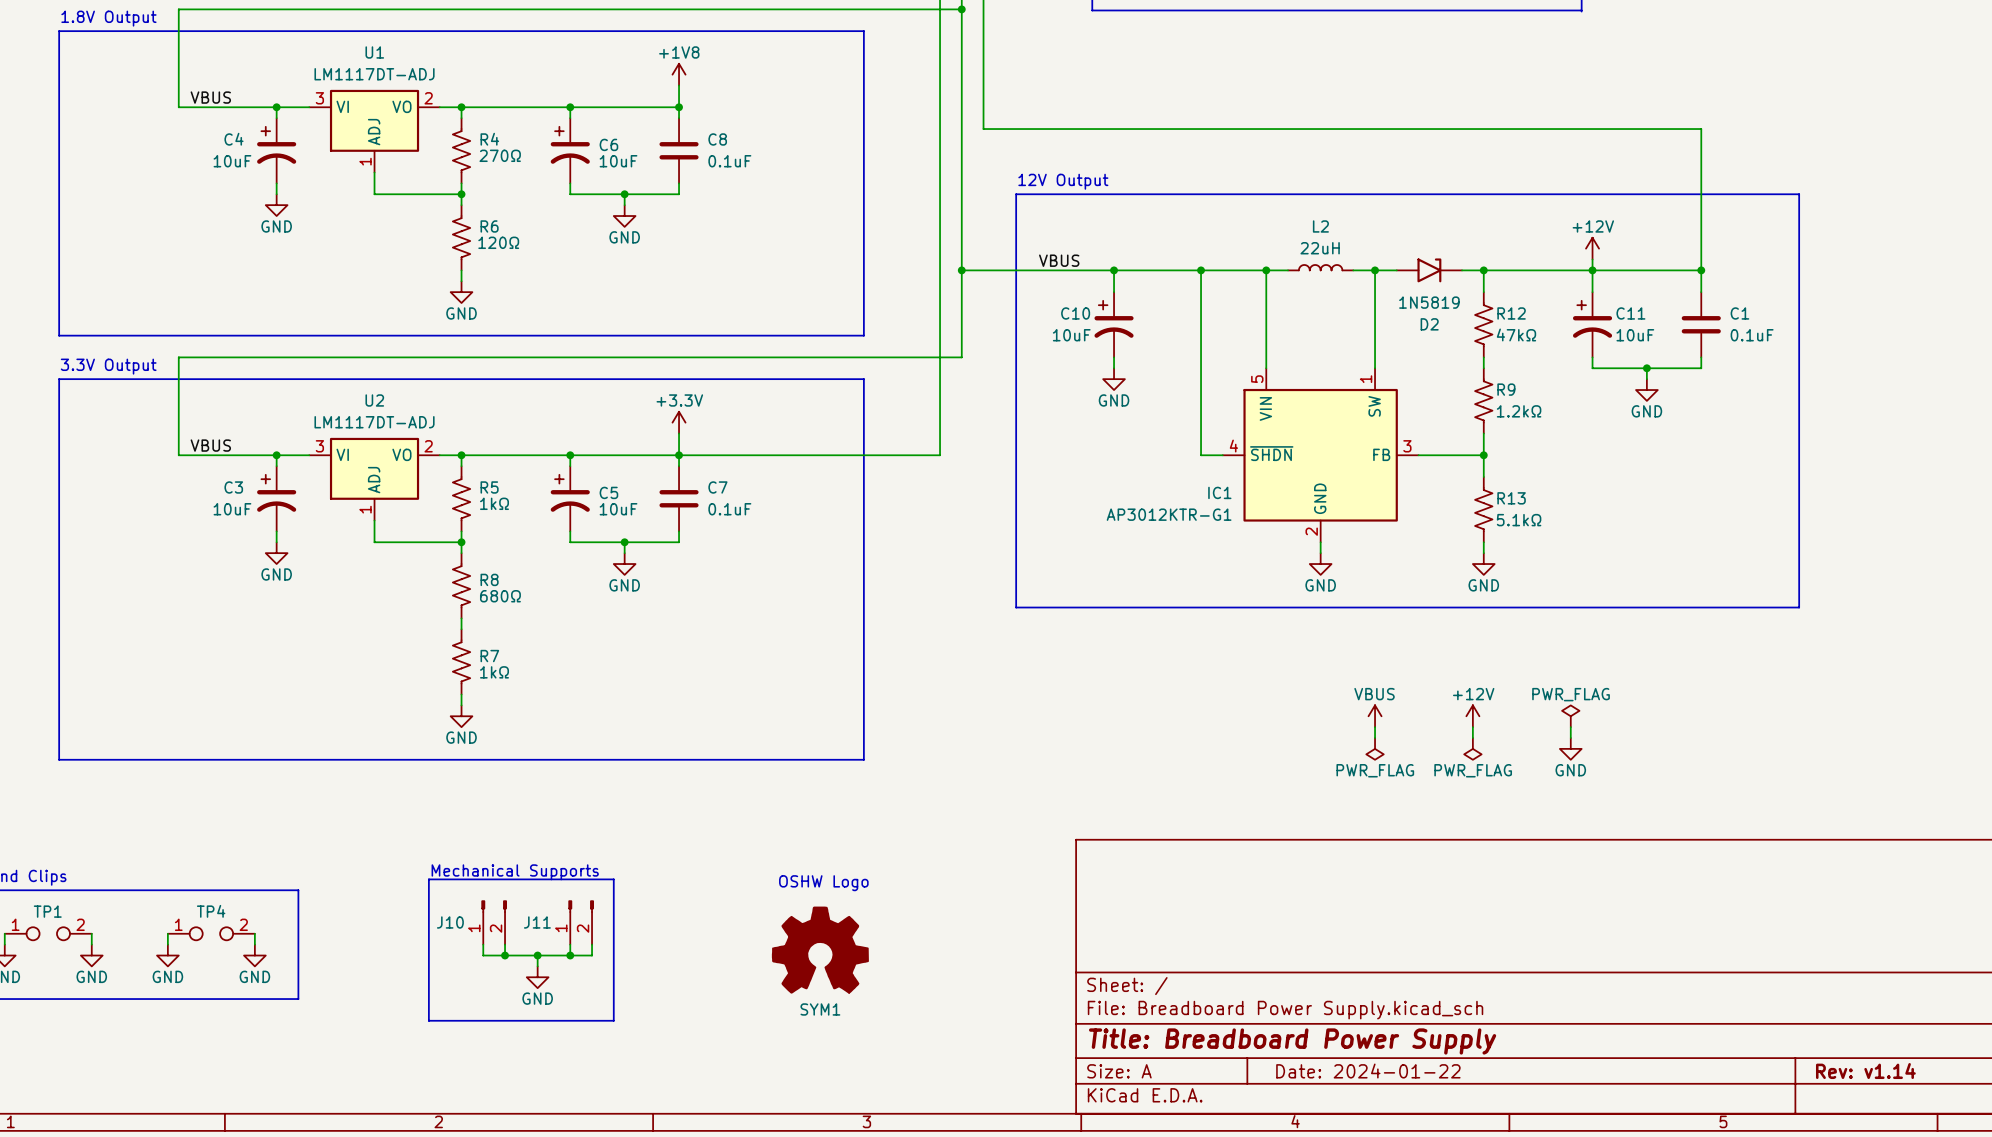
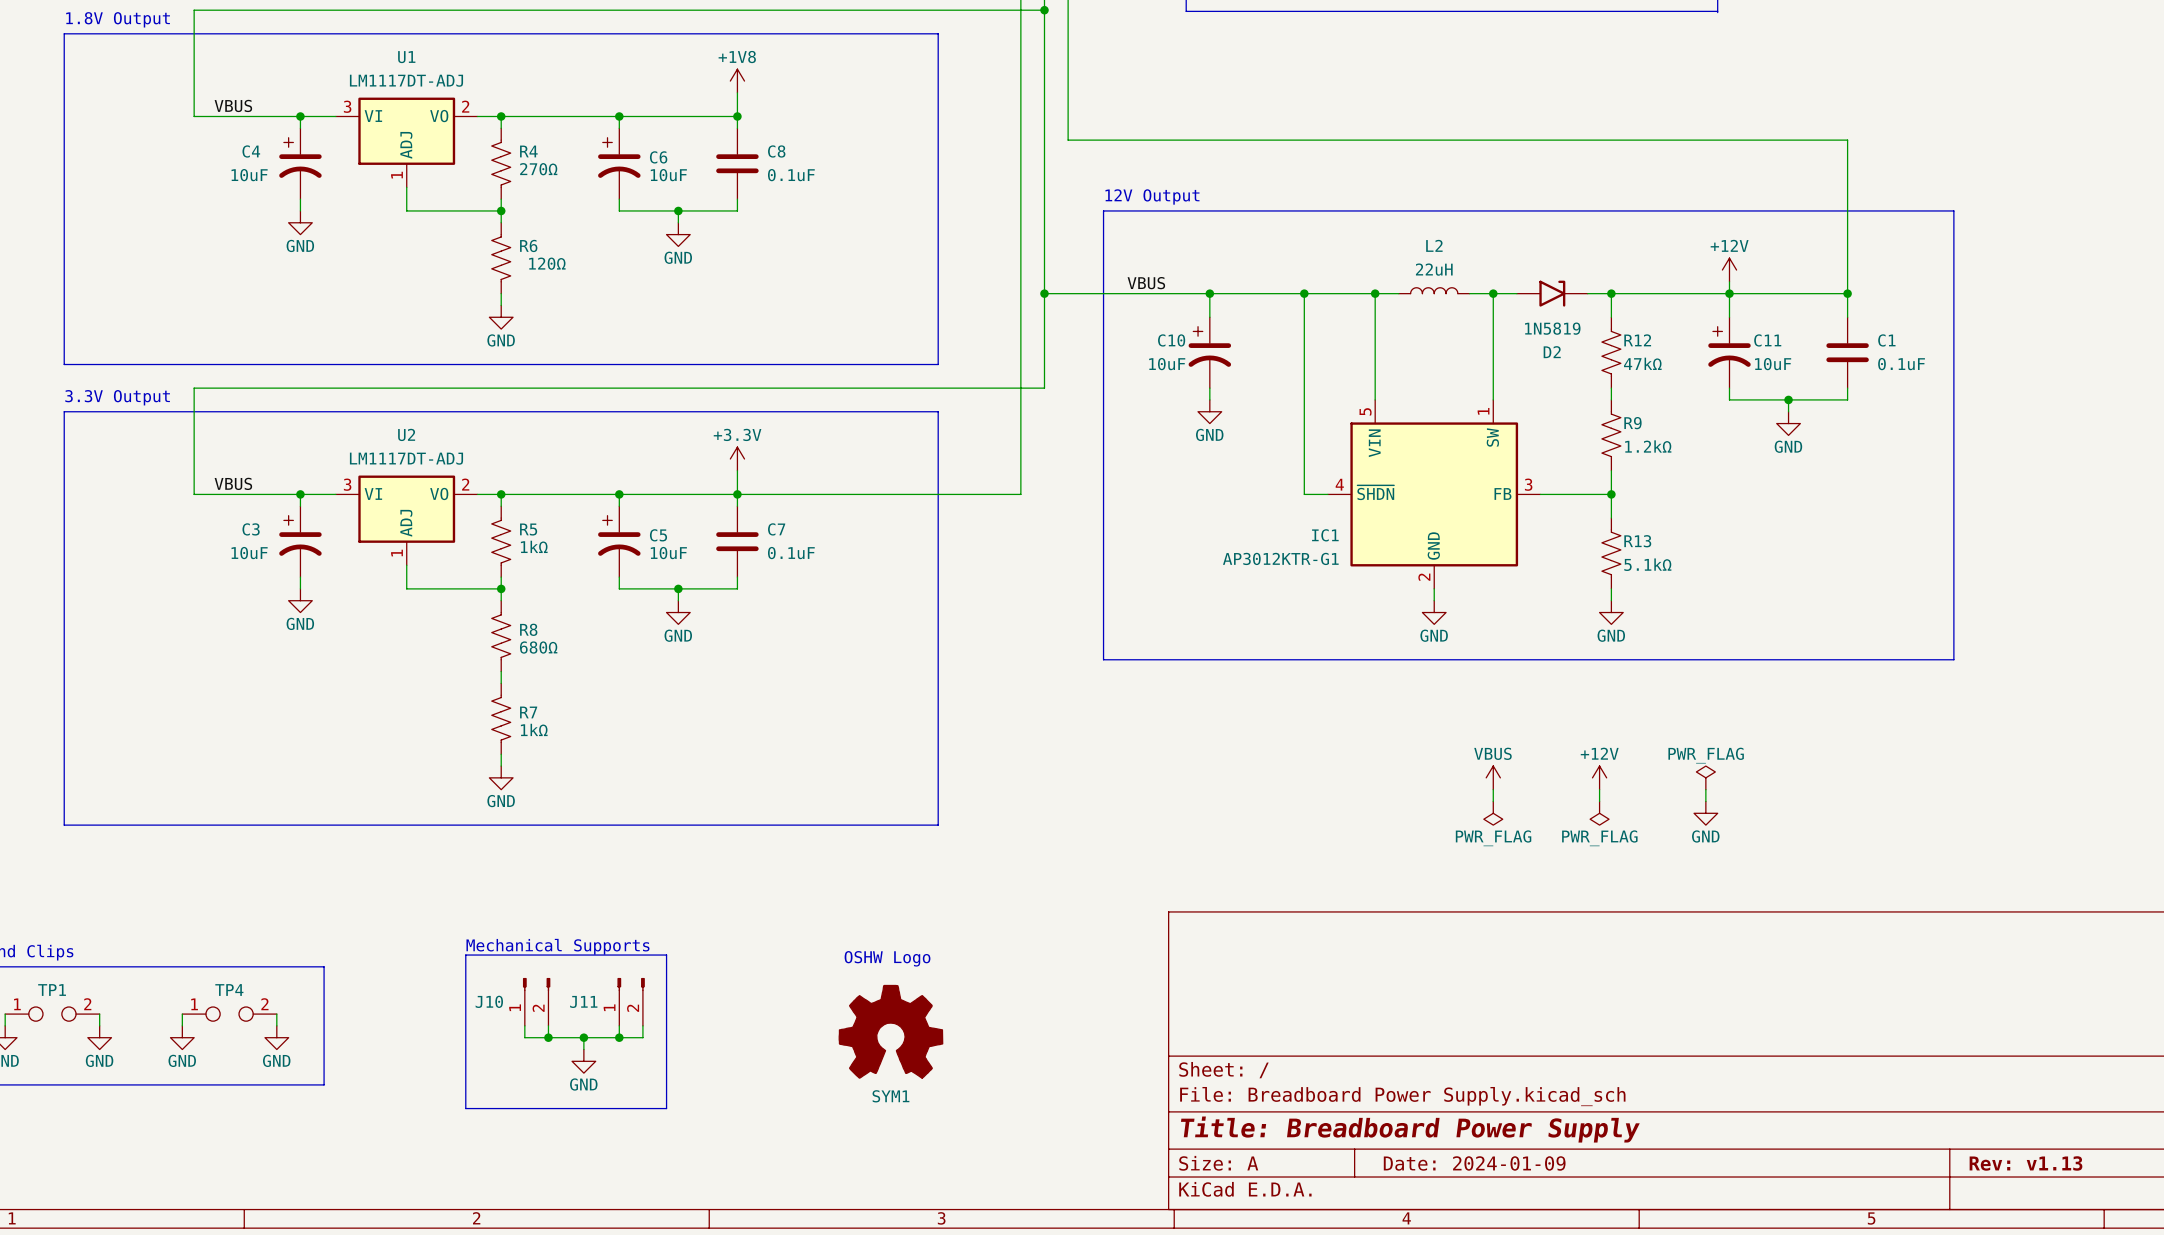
title block: Date: 2024-01-22 (1368, 1071) -> Date: 2024-01-09 (1474, 1163)
title block: Rev: v1.14 (1865, 1071) -> Rev: v1.13 (2025, 1163)

